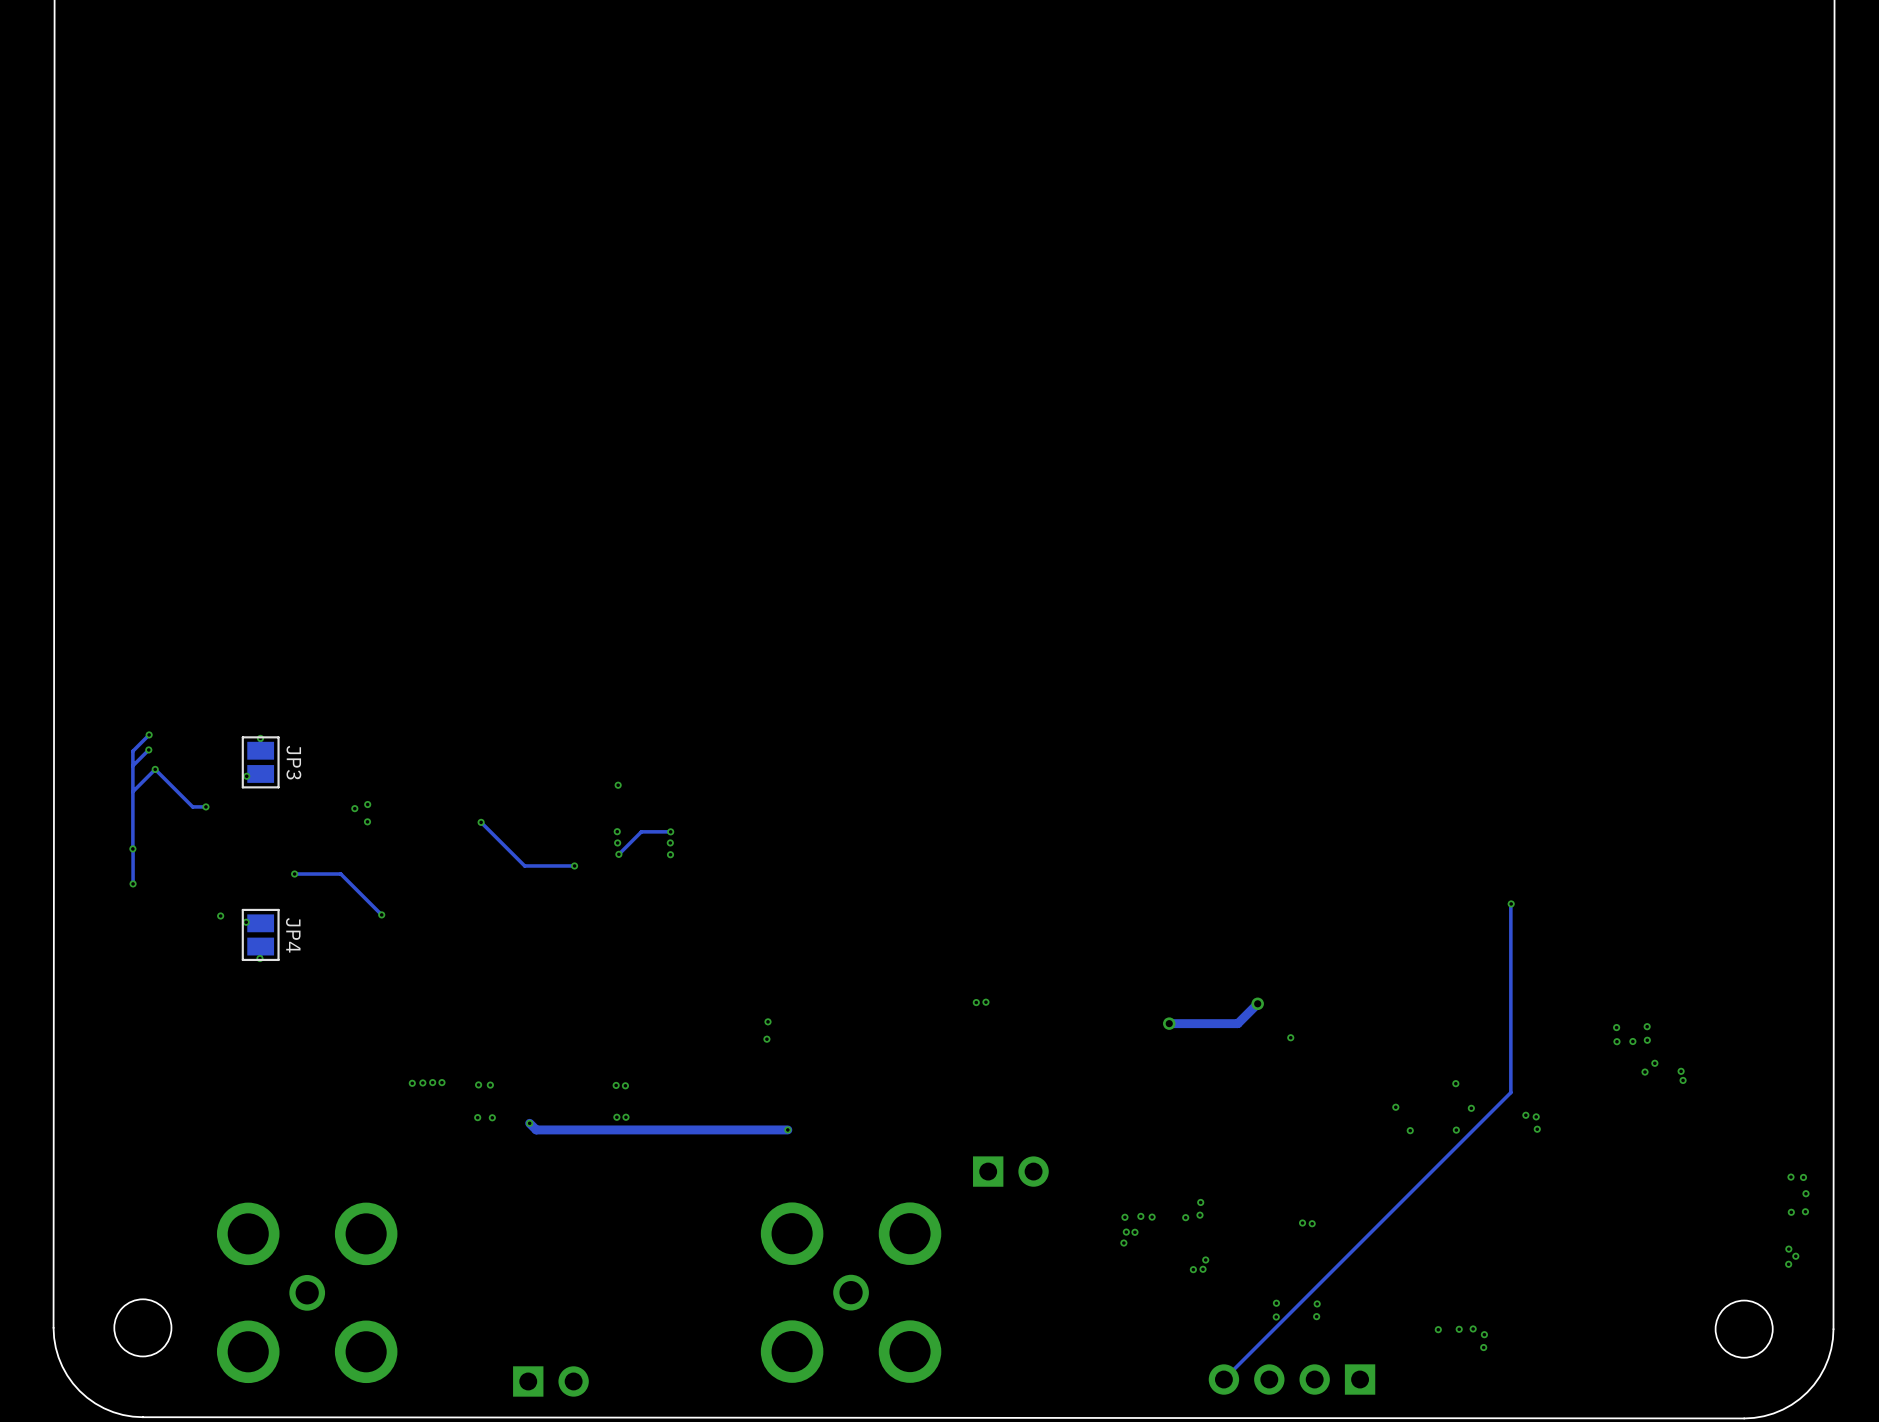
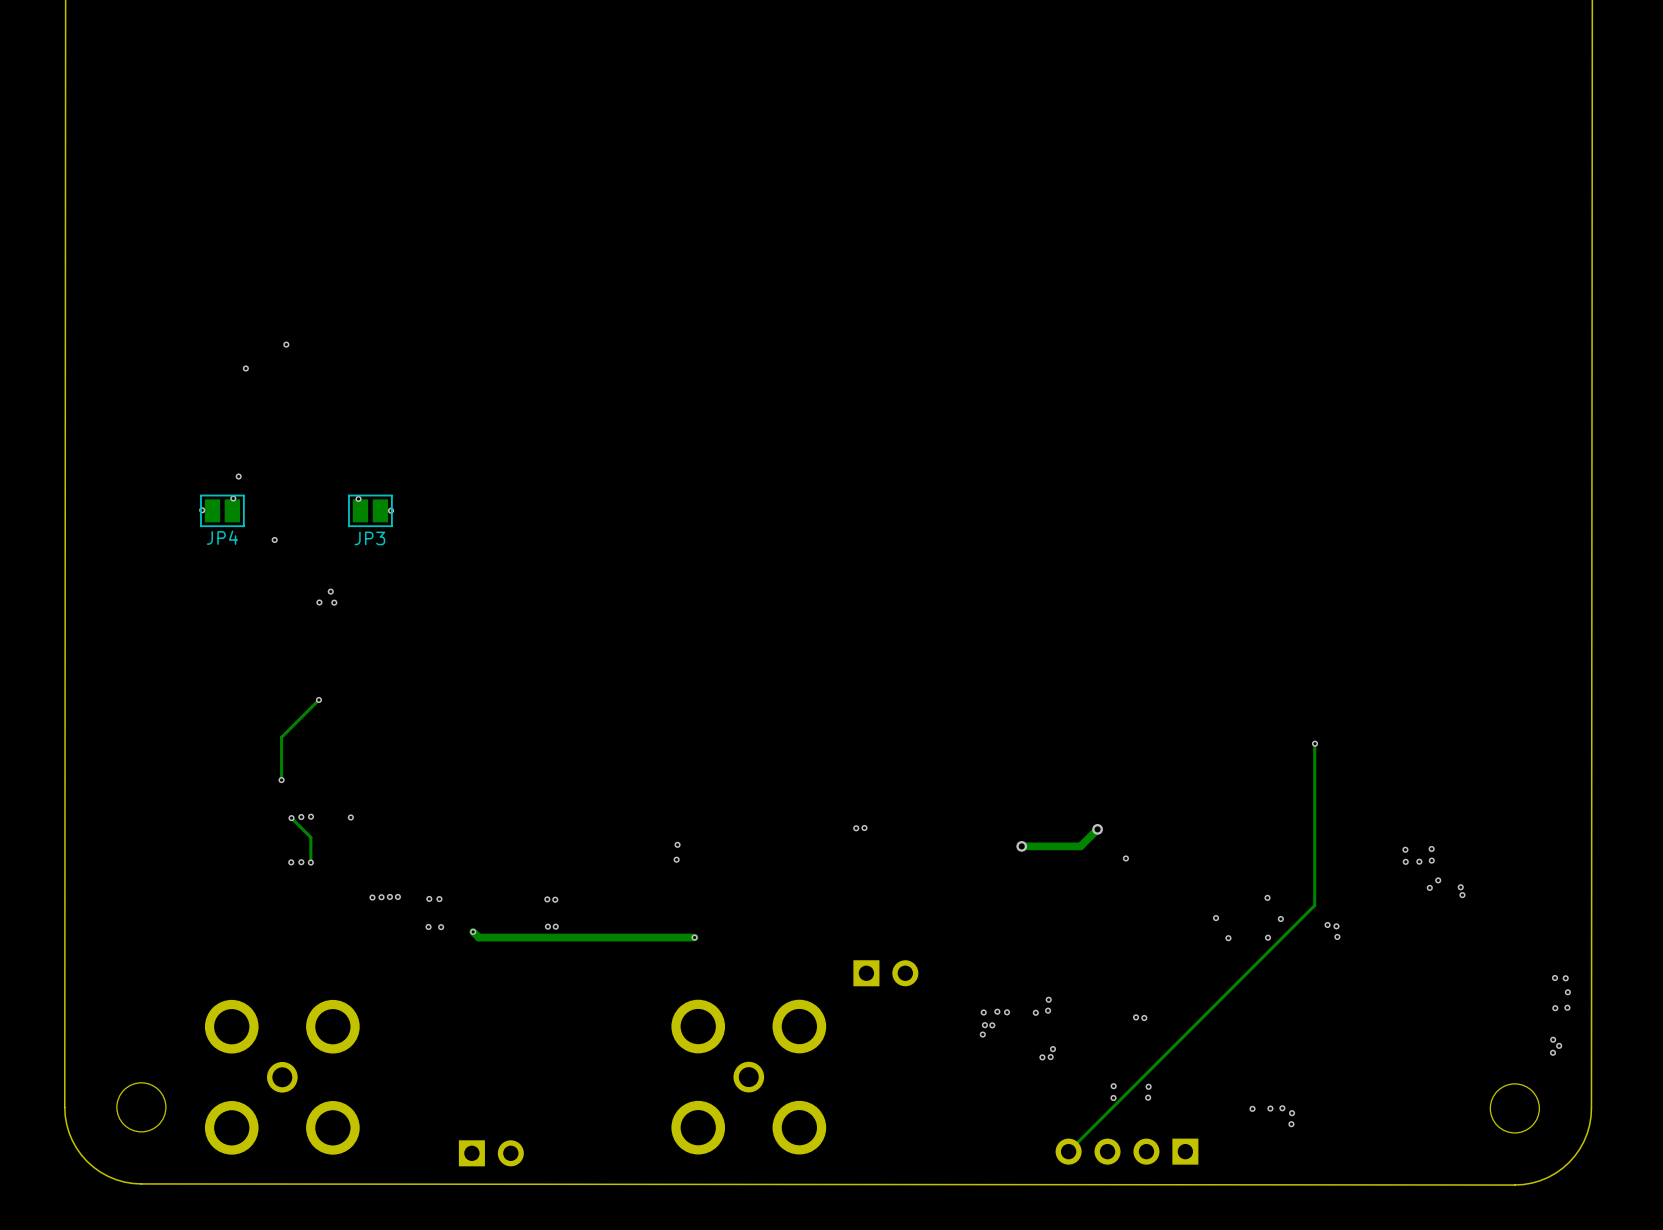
via: none -> (286, 344)
via: none -> (245, 368)
via: none -> (238, 476)
via: none -> (233, 498)
via: none -> (358, 498)
via: none -> (202, 510)
via: none -> (390, 510)
via: none -> (274, 539)
via: none -> (330, 591)
track: (149, 734) (132, 751) (132, 848) -> none
via: (149, 734) -> none
via: (260, 738) -> none
via: none -> (319, 602)
via: none -> (334, 602)
track: (148, 749) (132, 765) -> none
via: (148, 749) -> none
JP3 rotation: 0° (260, 762) -> 90° clockwise (370, 510)
JP3 position: (260, 762) -> (370, 510)
via: (155, 769) -> none
via: (246, 776) -> none
via: (618, 785) -> none
track: (132, 791) (155, 769) (192, 806) (205, 806) -> none
via: (367, 804) -> none
via: (205, 806) -> none
via: (354, 808) -> none
via: (367, 821) -> none
track: (481, 822) (524, 865) (574, 865) -> none
via: (481, 822) -> none
via: (617, 831) -> none
track: (670, 831) (641, 831) (618, 854) -> none
via: (670, 831) -> none
via: (617, 842) -> none
via: (670, 842) -> none
via: (132, 848) -> none
track: (133, 849) (133, 883) -> none
track: none -> (318, 699) (281, 737) (281, 780)
via: none -> (318, 699)
via: (618, 854) -> none
via: (670, 854) -> none
via: (574, 865) -> none
track: (294, 874) (340, 874) (381, 914) -> none
via: (294, 874) -> none
via: (133, 883) -> none
via: (381, 914) -> none
via: (220, 915) -> none
via: (246, 922) -> none
JP4 rotation: 0° (260, 934) -> 90° clockwise (222, 510)
JP4 position: (260, 934) -> (222, 510)
via: none -> (281, 780)
via: (259, 958) -> none
via: none -> (301, 817)
via: none -> (311, 816)
via: none -> (350, 817)
track: none -> (291, 818) (310, 837) (310, 862)
via: none -> (291, 818)
via: none -> (291, 862)
via: none -> (301, 862)
via: none -> (310, 862)

